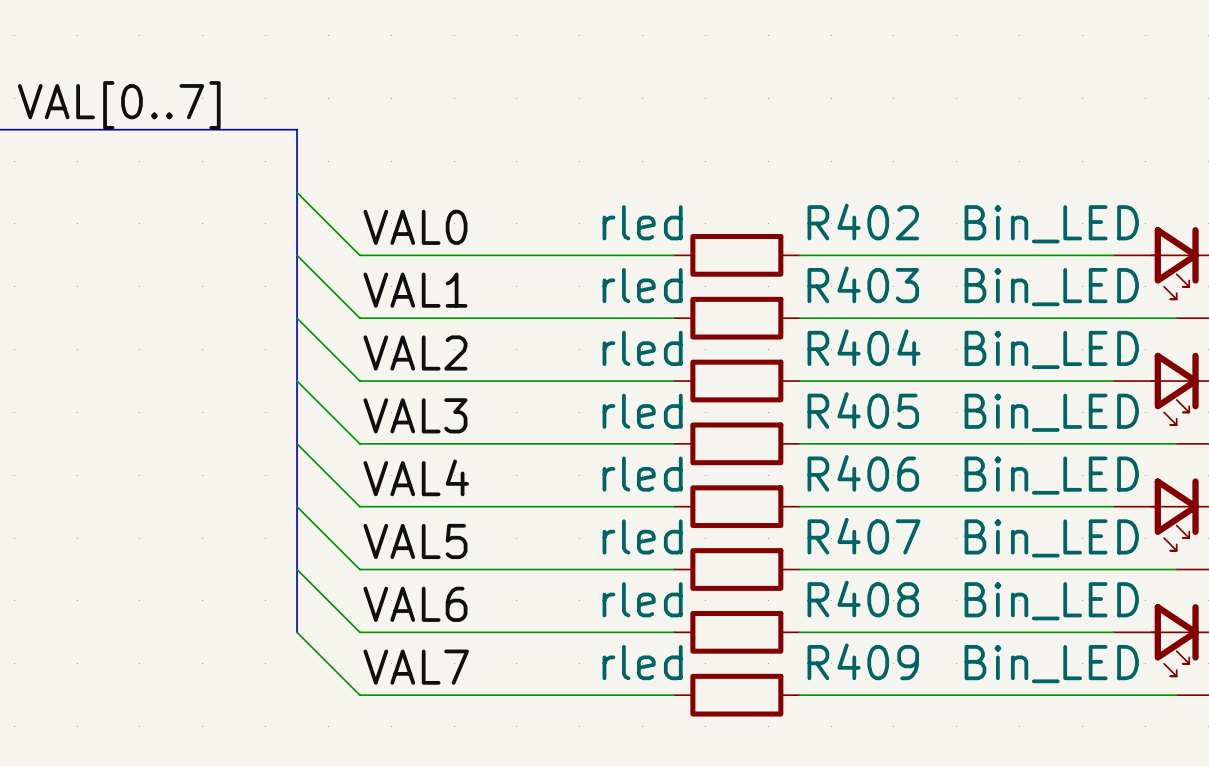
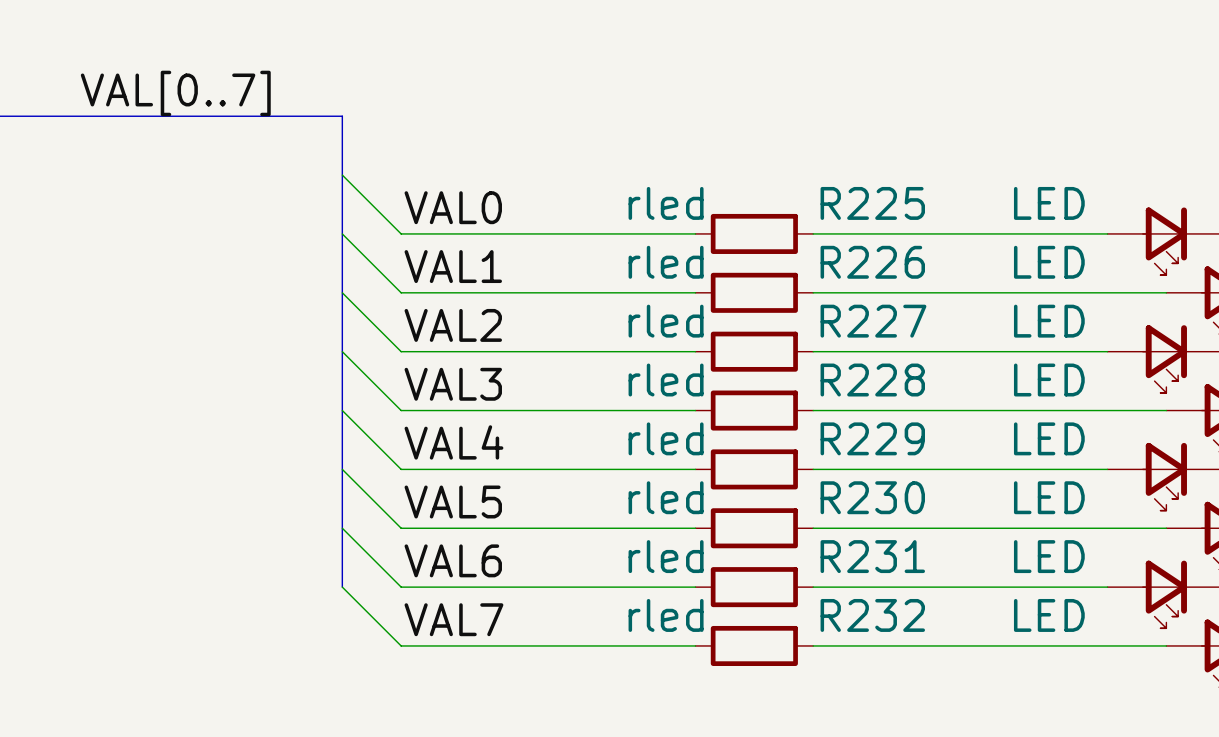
R402 name: R402 (863, 222) -> R225 (872, 203)
part value: Bin_LED (1051, 224) -> LED (1049, 203)
R403 name: R403 (863, 284) -> R226 (872, 262)
part value: Bin_LED (1051, 287) -> LED (1049, 262)
R404 name: R404 (864, 347) -> R227 (873, 321)
part value: Bin_LED (1051, 349) -> LED (1049, 321)
R405 name: R405 (863, 410) -> R228 (872, 380)
part value: Bin_LED (1051, 412) -> LED (1049, 380)
R406 name: R406 (863, 473) -> R229 (872, 438)
part value: Bin_LED (1051, 475) -> LED (1049, 438)
R407 name: R407 (864, 536) -> R230 (872, 497)
part value: Bin_LED (1051, 538) -> LED (1049, 497)
R408 name: R408 (863, 599) -> R231 (872, 556)
part value: Bin_LED (1051, 601) -> LED (1049, 556)
R409 name: R409 (863, 661) -> R232 (872, 615)
part value: Bin_LED (1051, 664) -> LED (1049, 615)

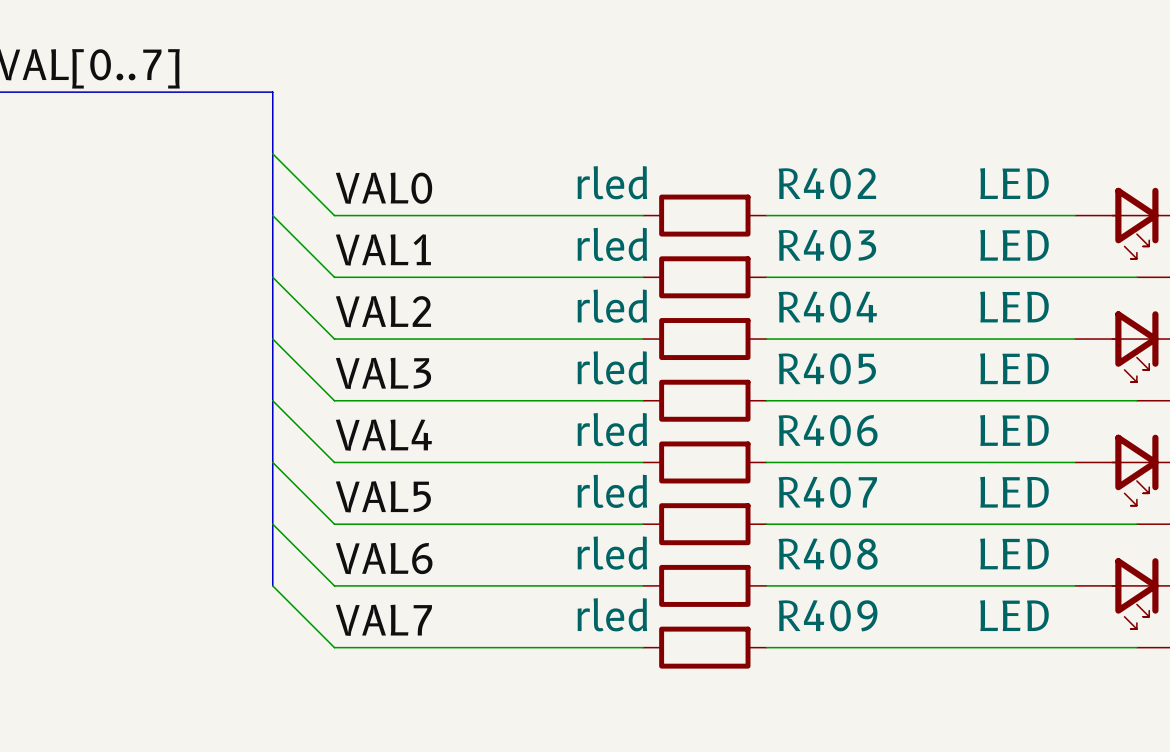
R225 name: R225 (872, 203) -> R402 (827, 183)
R226 name: R226 (872, 262) -> R403 (827, 245)
R227 name: R227 (873, 321) -> R404 (827, 307)
R228 name: R228 (872, 380) -> R405 (827, 368)
R229 name: R229 (872, 438) -> R406 (828, 430)
R230 name: R230 (872, 497) -> R407 (827, 492)
R231 name: R231 (872, 556) -> R408 (828, 554)
R232 name: R232 (872, 615) -> R409 (828, 615)

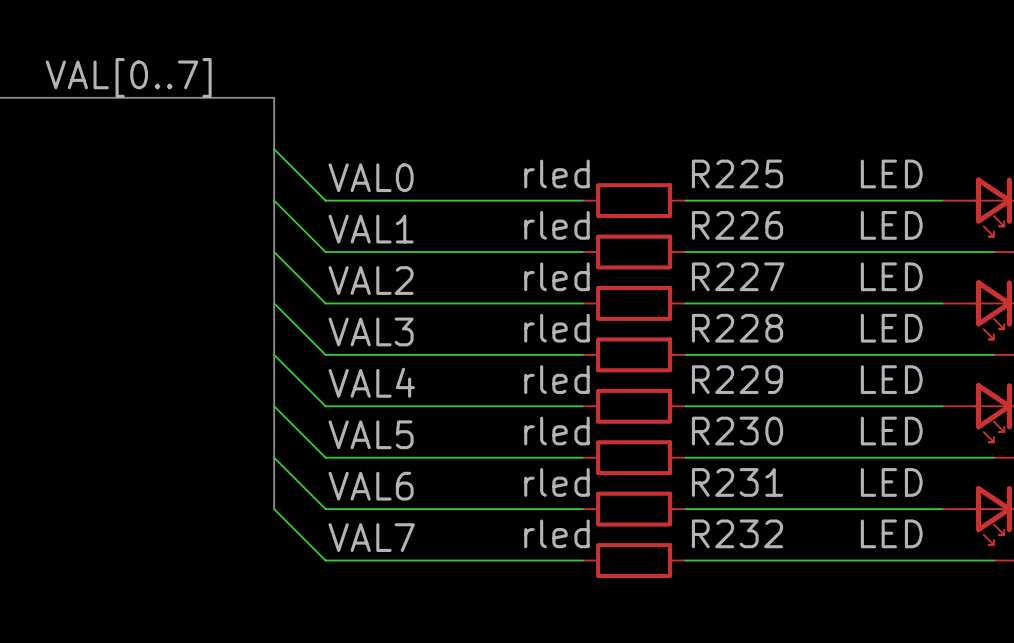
R402 name: R402 (827, 183) -> R225 (737, 173)
R403 name: R403 (827, 245) -> R226 (737, 225)
R404 name: R404 (827, 307) -> R227 (738, 276)
R405 name: R405 (827, 368) -> R228 (737, 328)
R406 name: R406 (828, 430) -> R229 (737, 379)
R407 name: R407 (827, 492) -> R230 (737, 431)
R408 name: R408 (828, 554) -> R231 (737, 482)
R409 name: R409 (828, 615) -> R232 (737, 533)

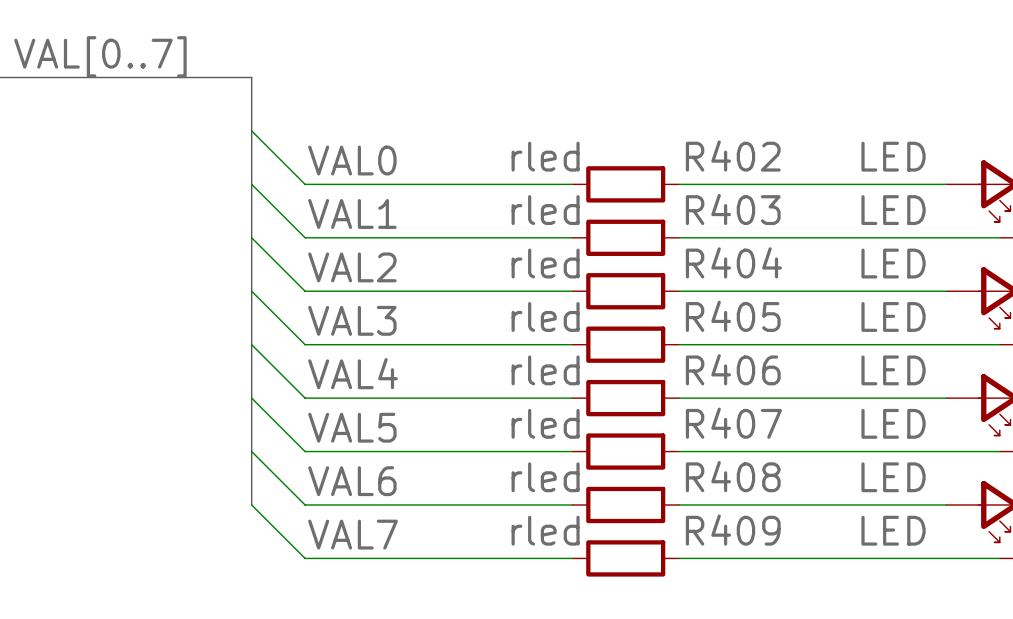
R225 name: R225 (737, 173) -> R402 (733, 156)
R226 name: R226 (737, 225) -> R403 (733, 209)
R227 name: R227 (738, 276) -> R404 (733, 262)
R228 name: R228 (737, 328) -> R405 (733, 316)
R229 name: R229 (737, 379) -> R406 (733, 369)
R230 name: R230 (737, 431) -> R407 (733, 423)
R231 name: R231 (737, 482) -> R408 (733, 476)
R232 name: R232 (737, 533) -> R409 (733, 530)

